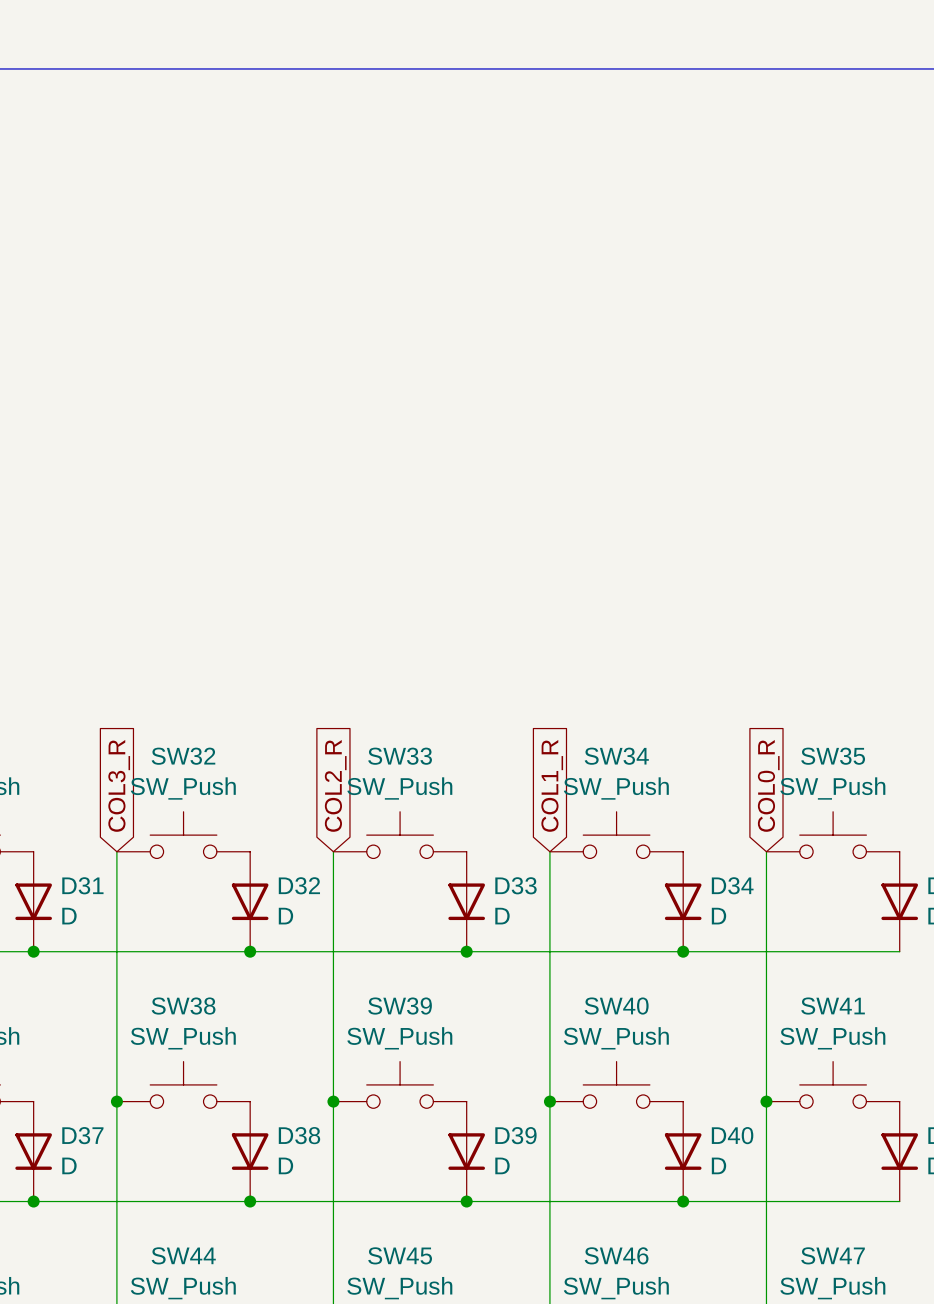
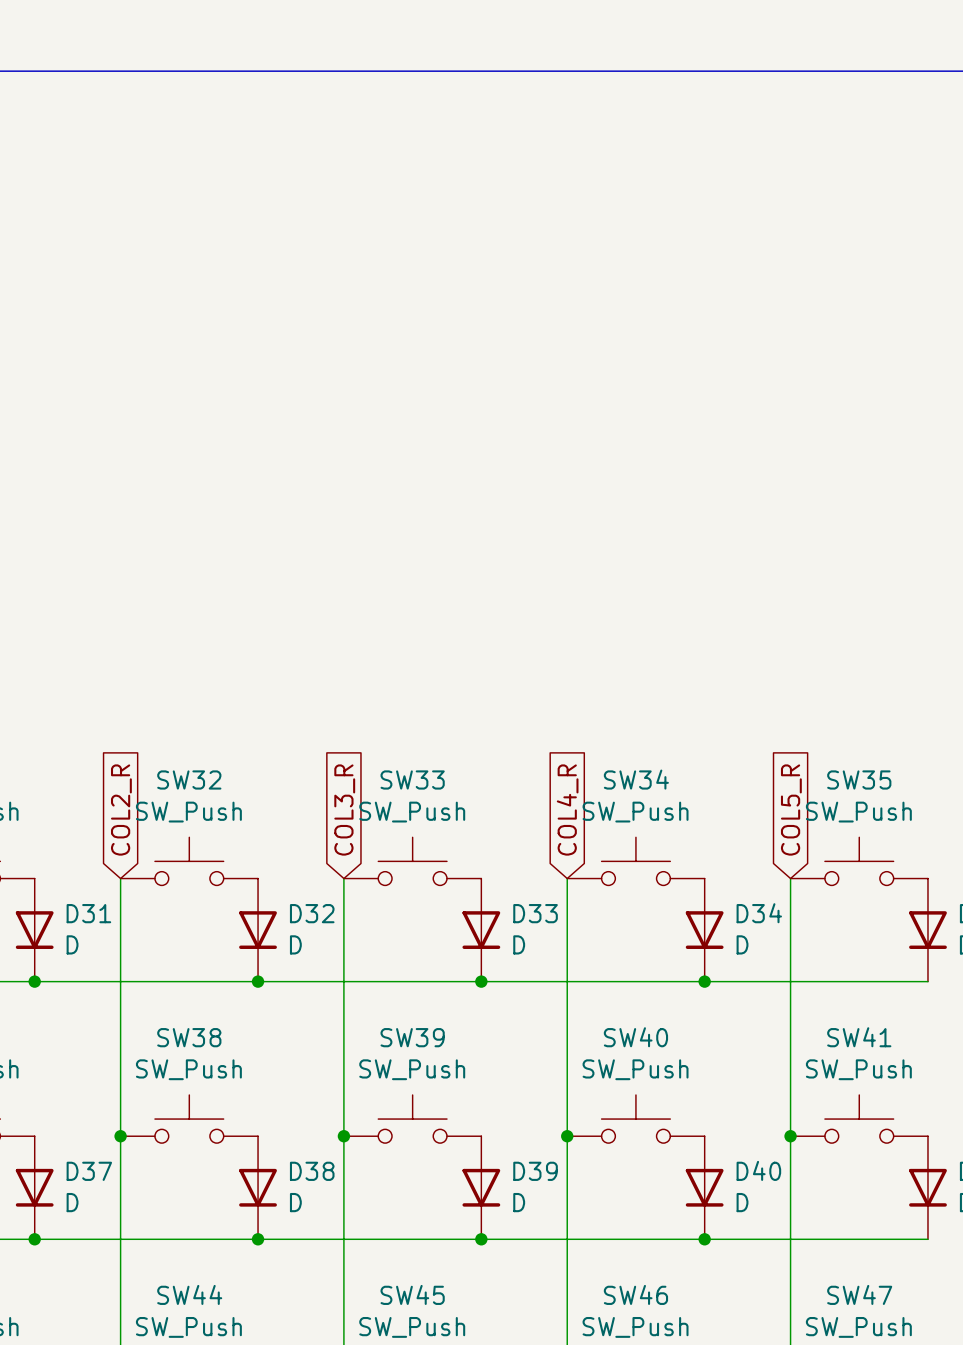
global label: COL3_R (119, 785) -> COL2_R (121, 810)
global label: COL2_R (335, 785) -> COL3_R (344, 810)
global label: COL1_R (552, 785) -> COL4_R (567, 810)
global label: COL0_R (768, 785) -> COL5_R (791, 810)

